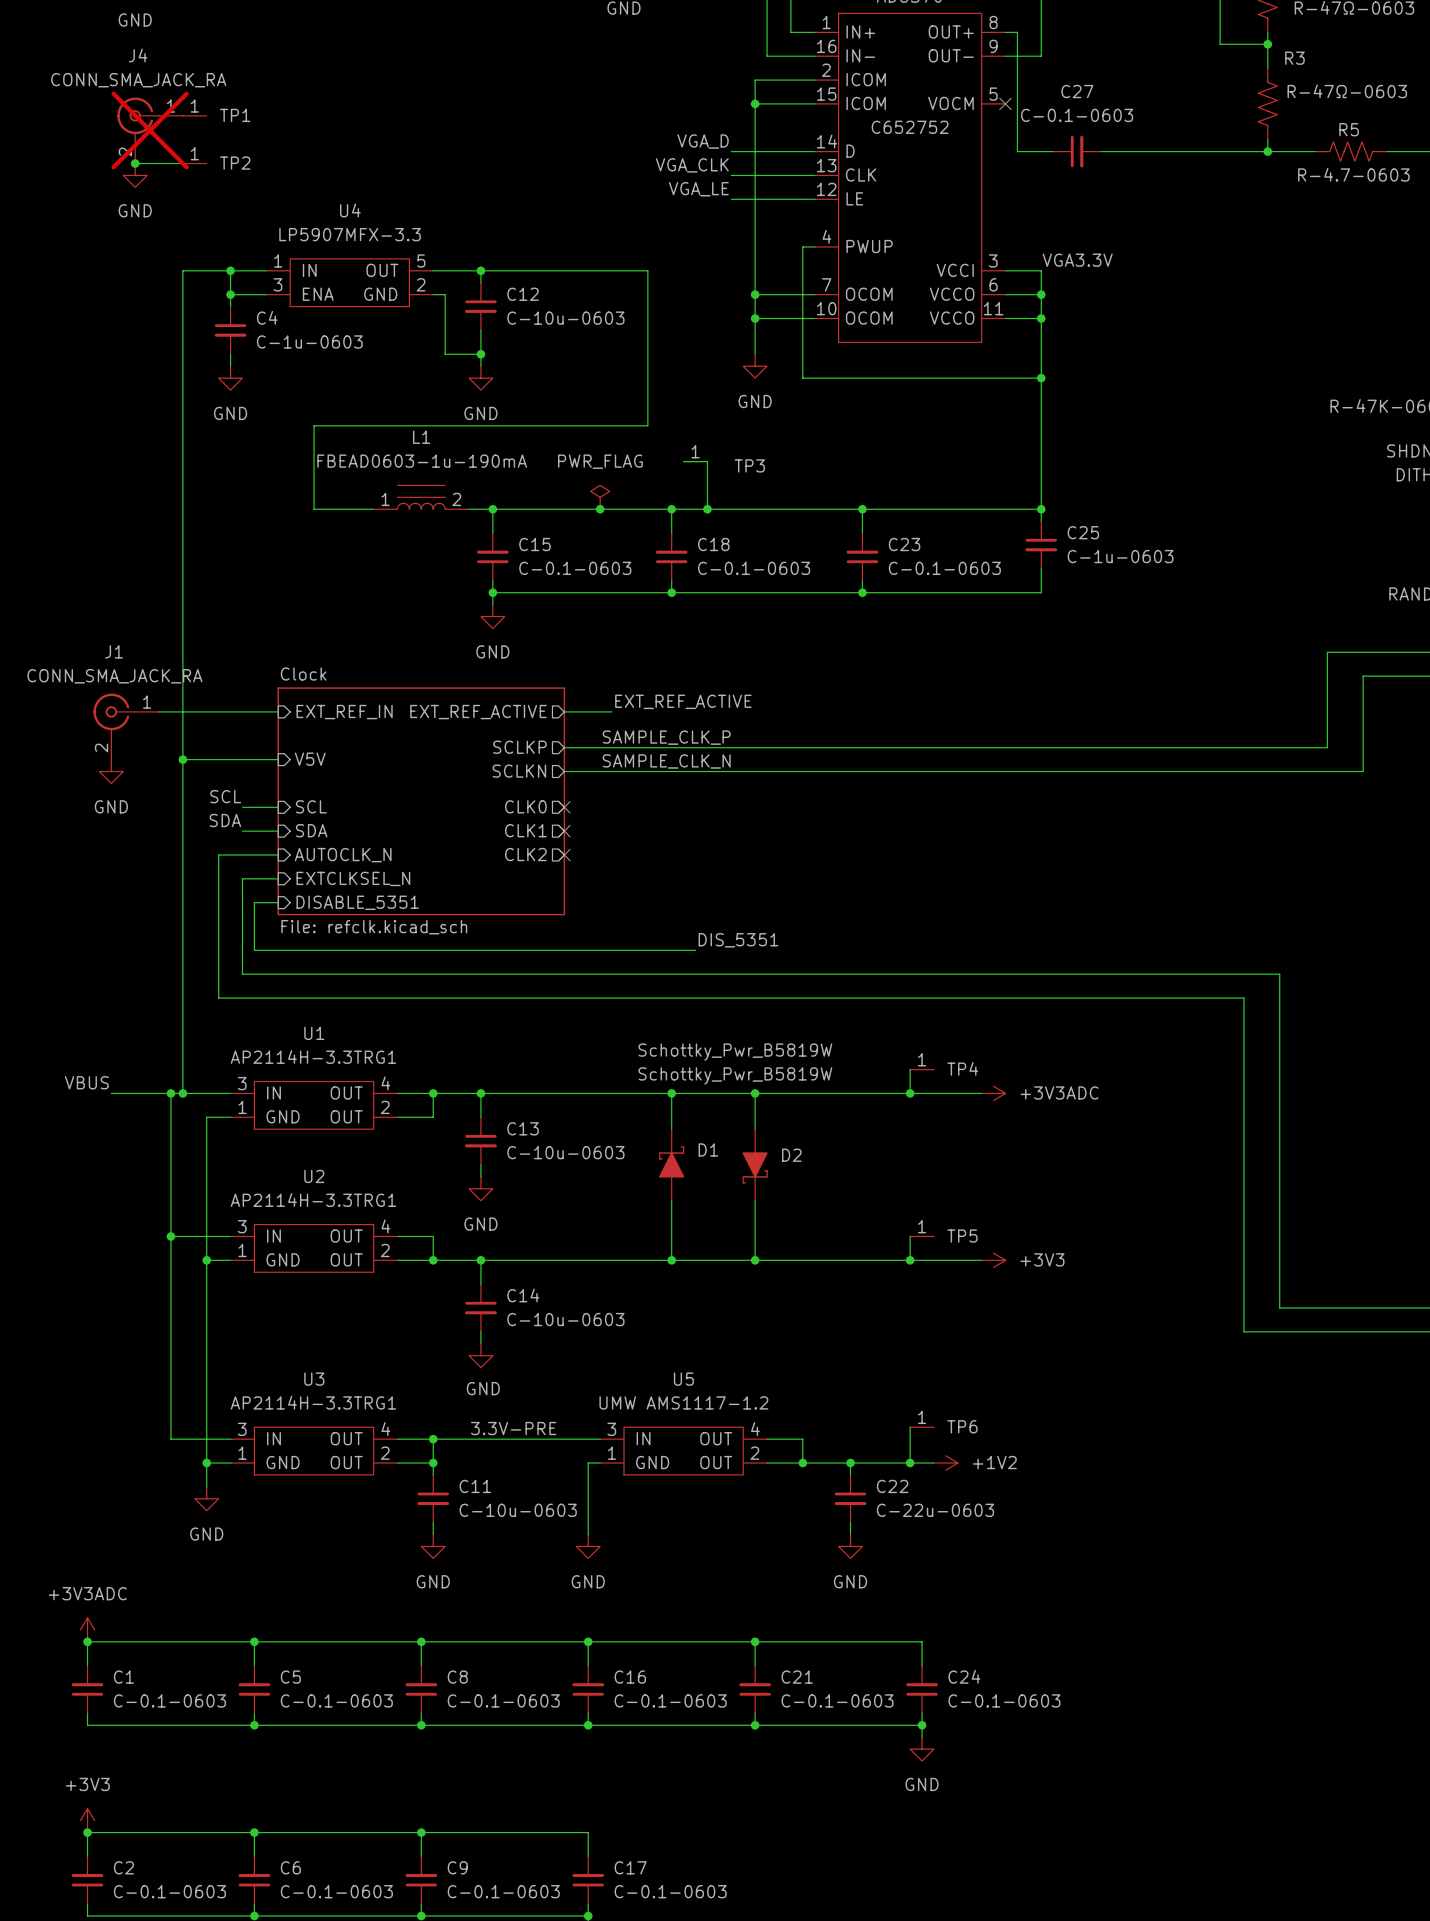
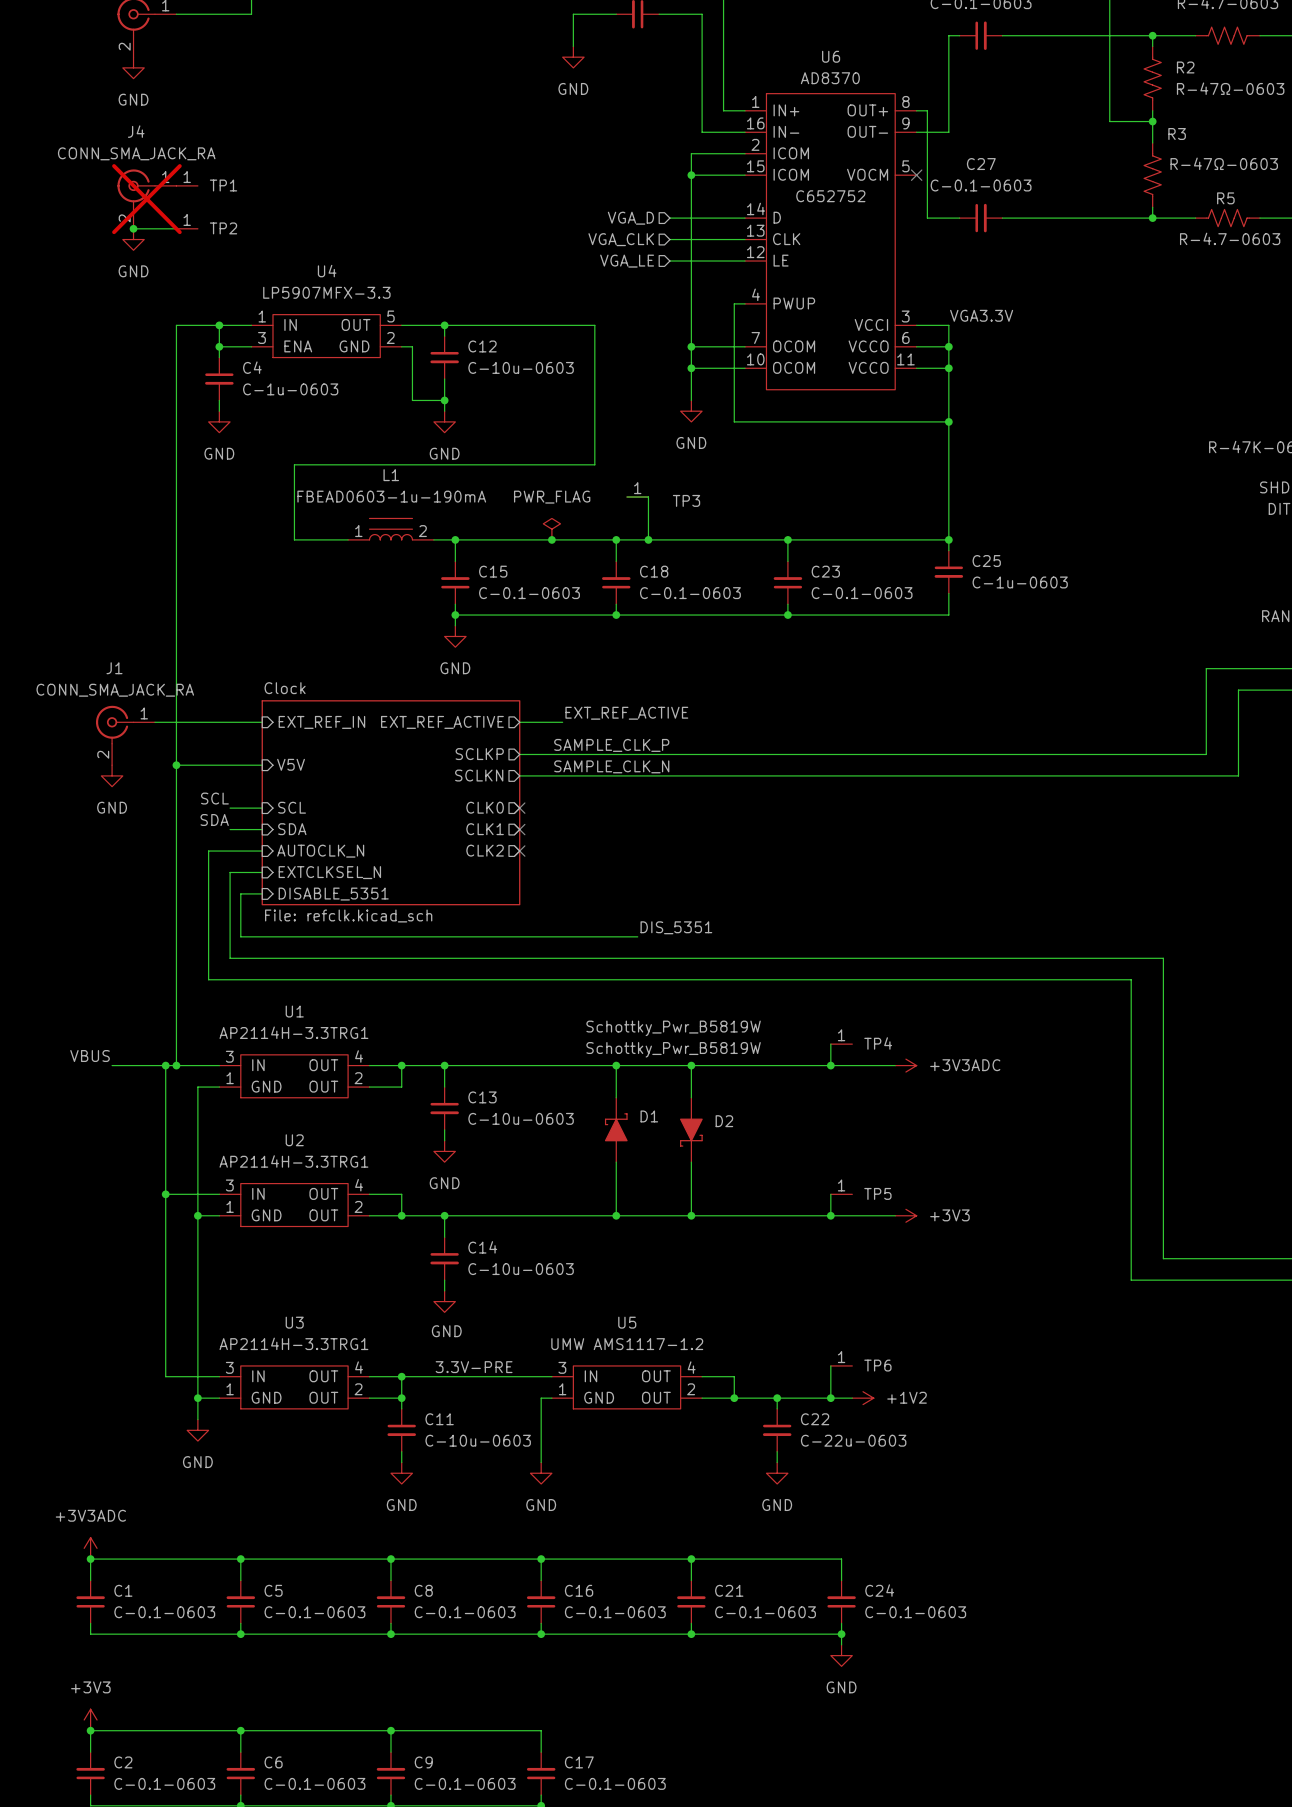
label: VGA_D (703, 141) -> none
hierarchical label: none -> VGA_D (630, 218)
label: VGA_CLK (692, 165) -> none
hierarchical label: none -> VGA_CLK (621, 239)
label: VGA_LE (698, 189) -> none
hierarchical label: none -> VGA_LE (627, 261)

